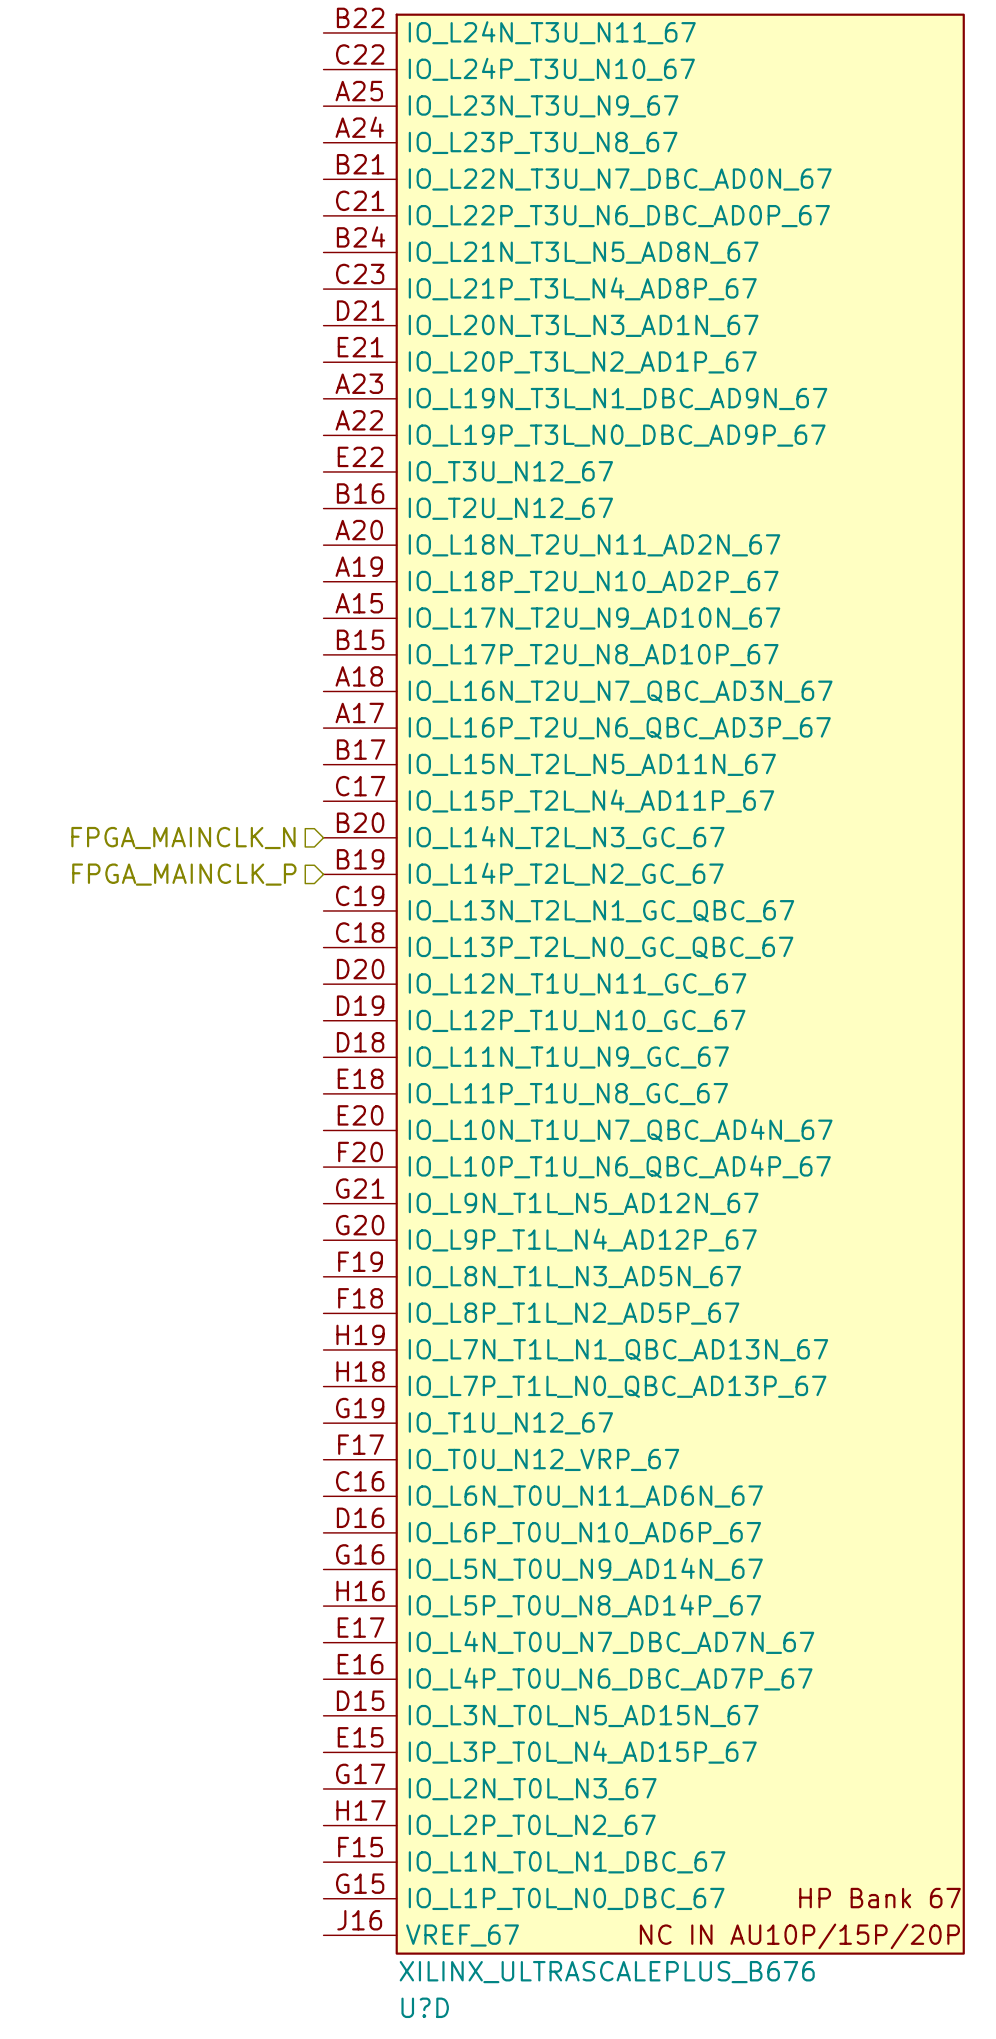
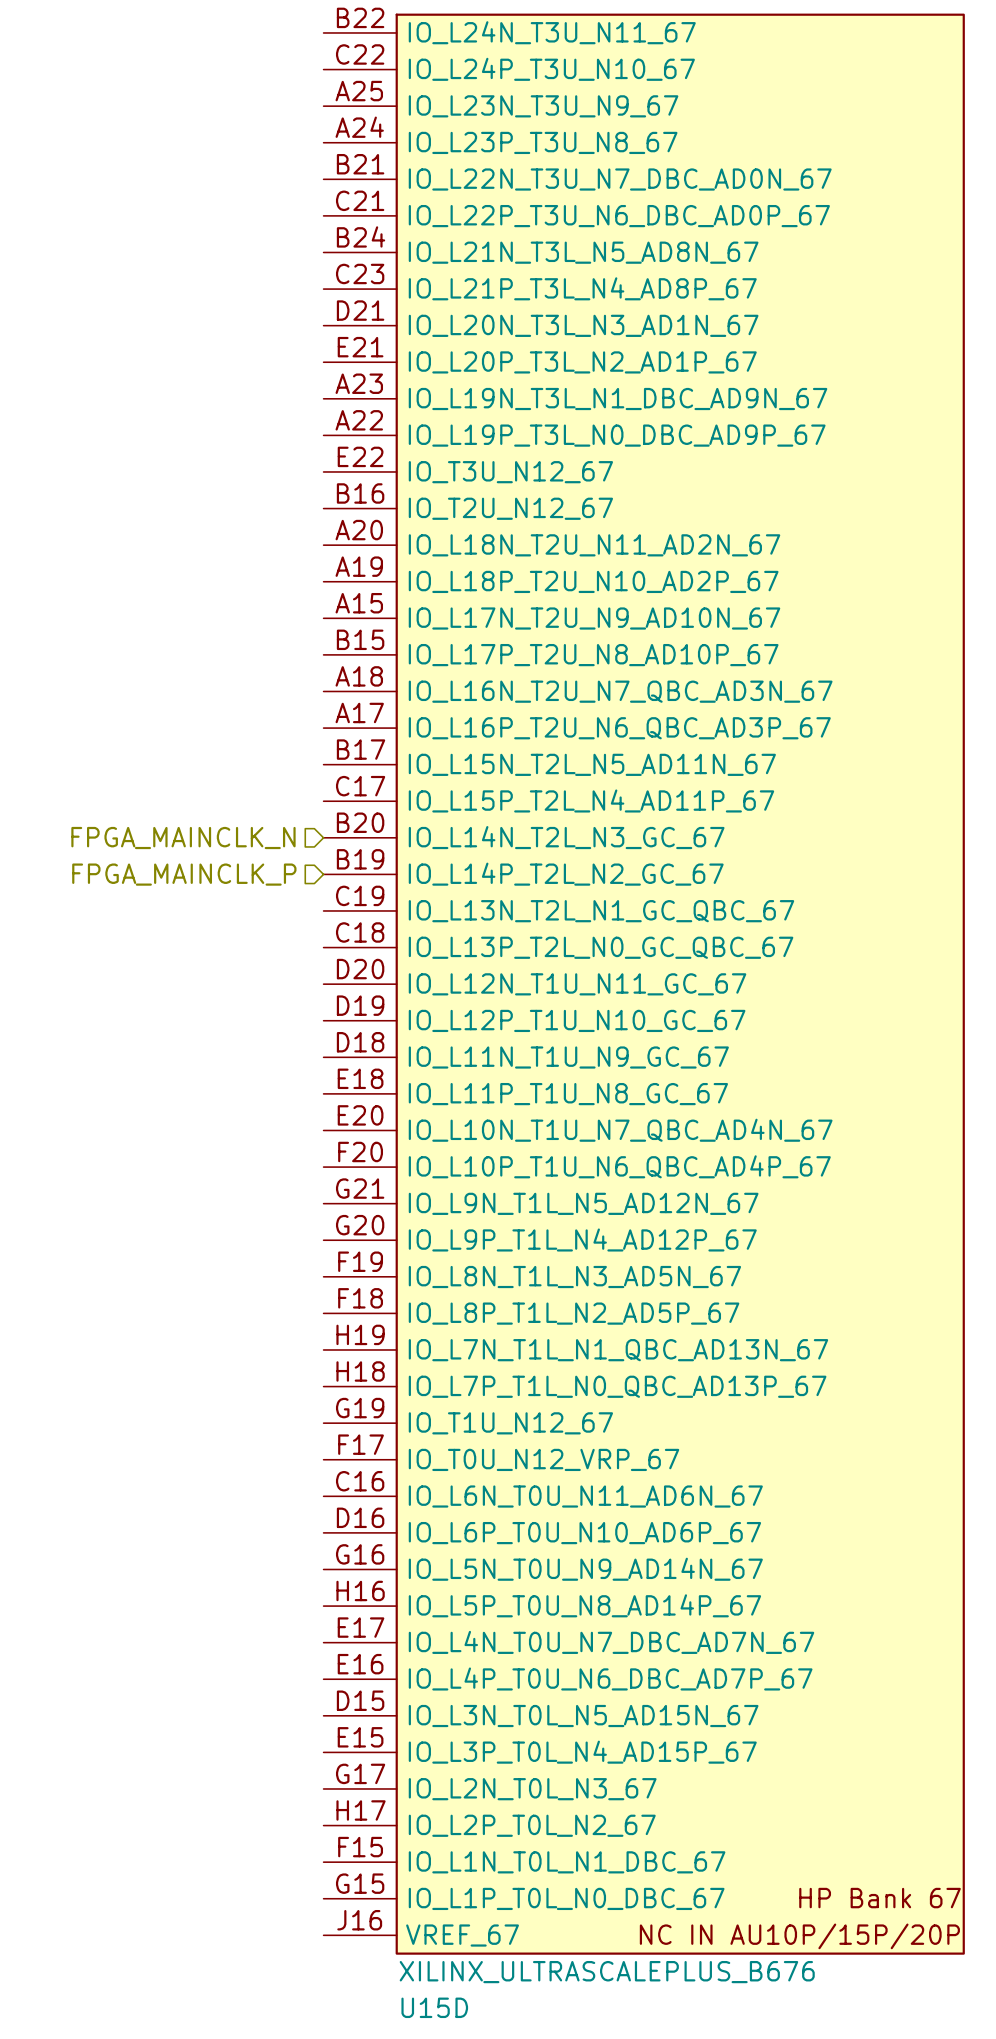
U?D name: U?D (425, 2007) -> U15D (434, 2007)

